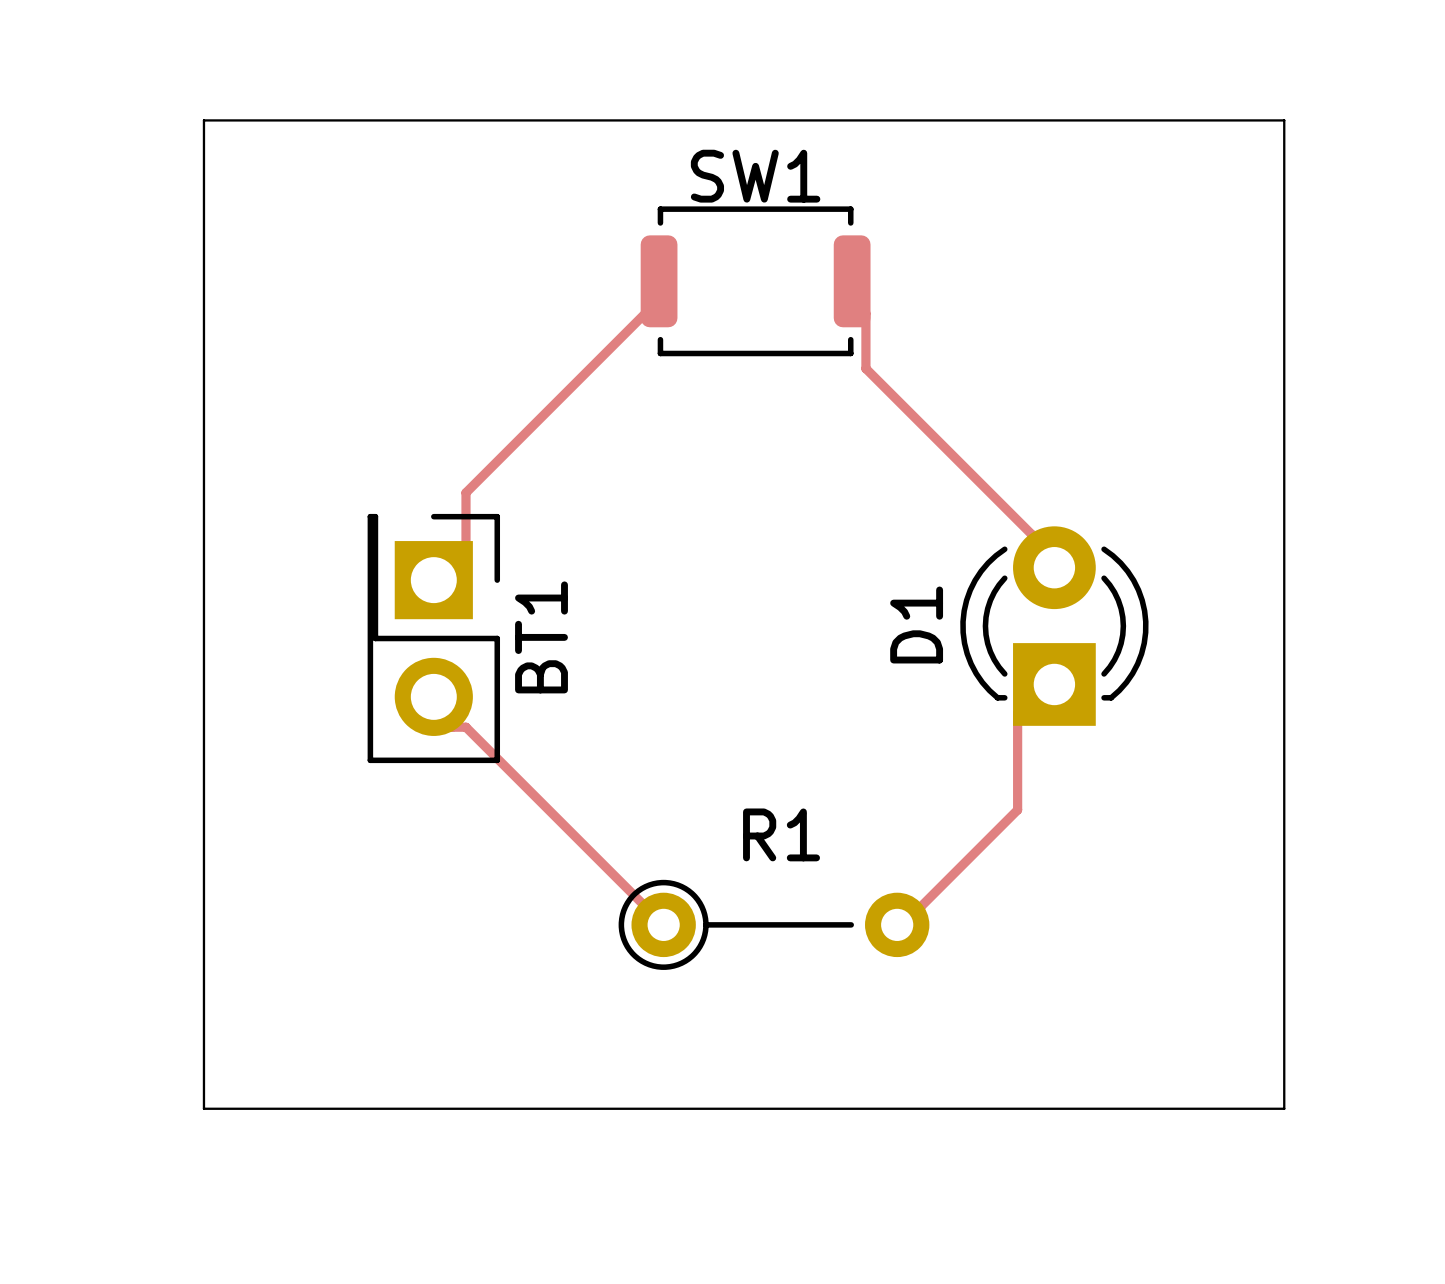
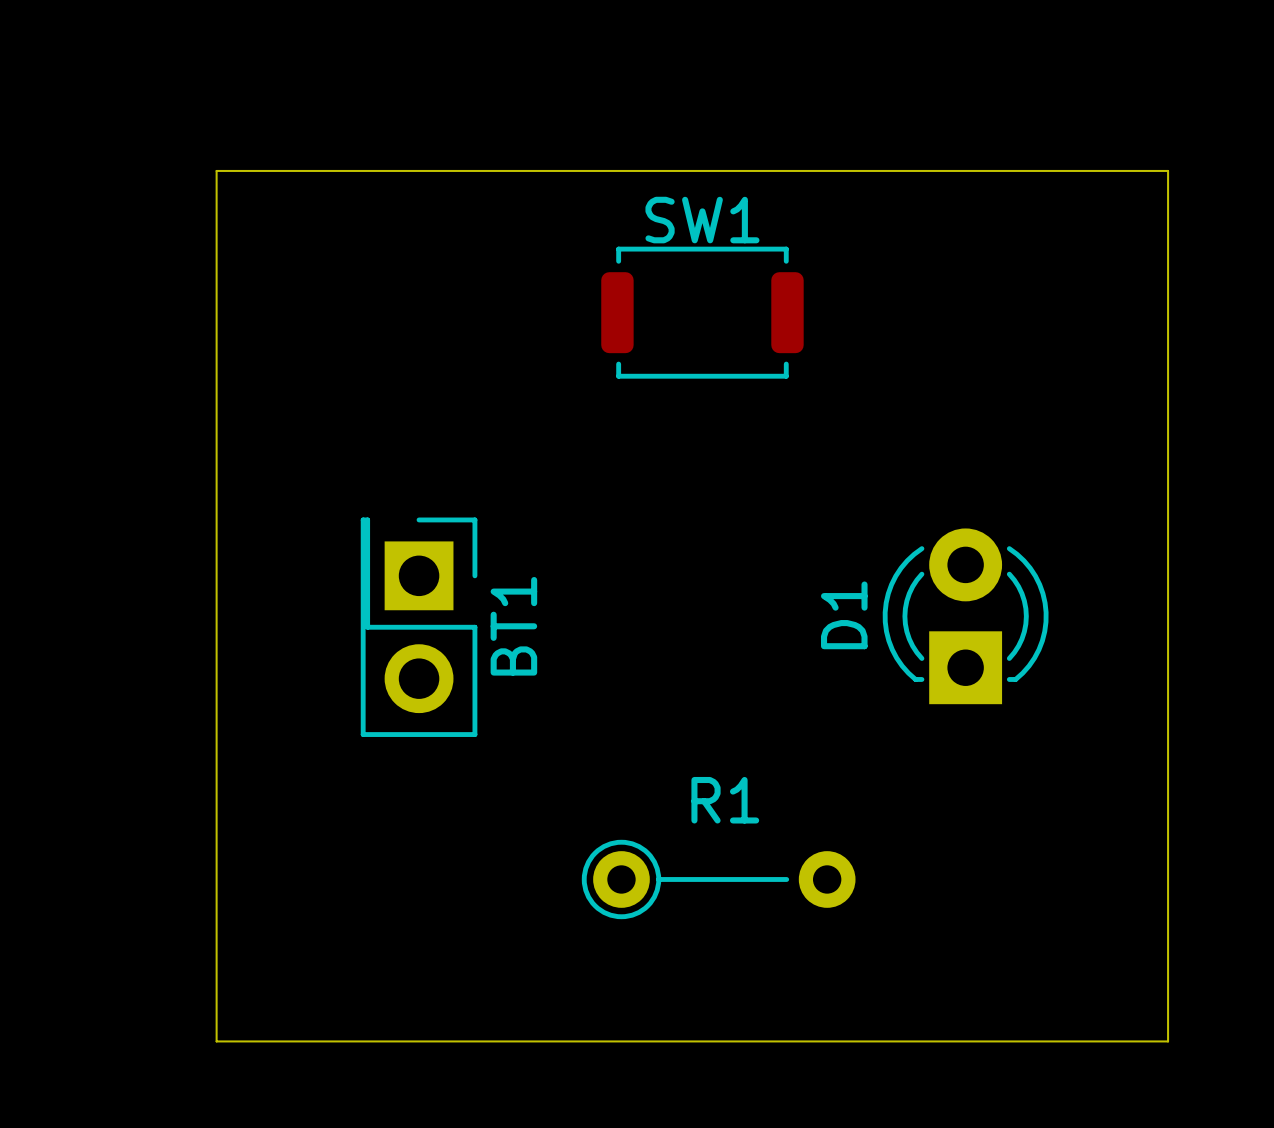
track: (659, 281) (645, 313) (465, 492) (465, 547) (433, 580) -> none
track: (852, 281) (865, 313) (865, 368) (1031, 534) (1054, 567) -> none
track: (1054, 684) (1017, 713) (1017, 809) (921, 906) (897, 924) -> none
track: (433, 696) (452, 727) (465, 727) (663, 924) -> none

